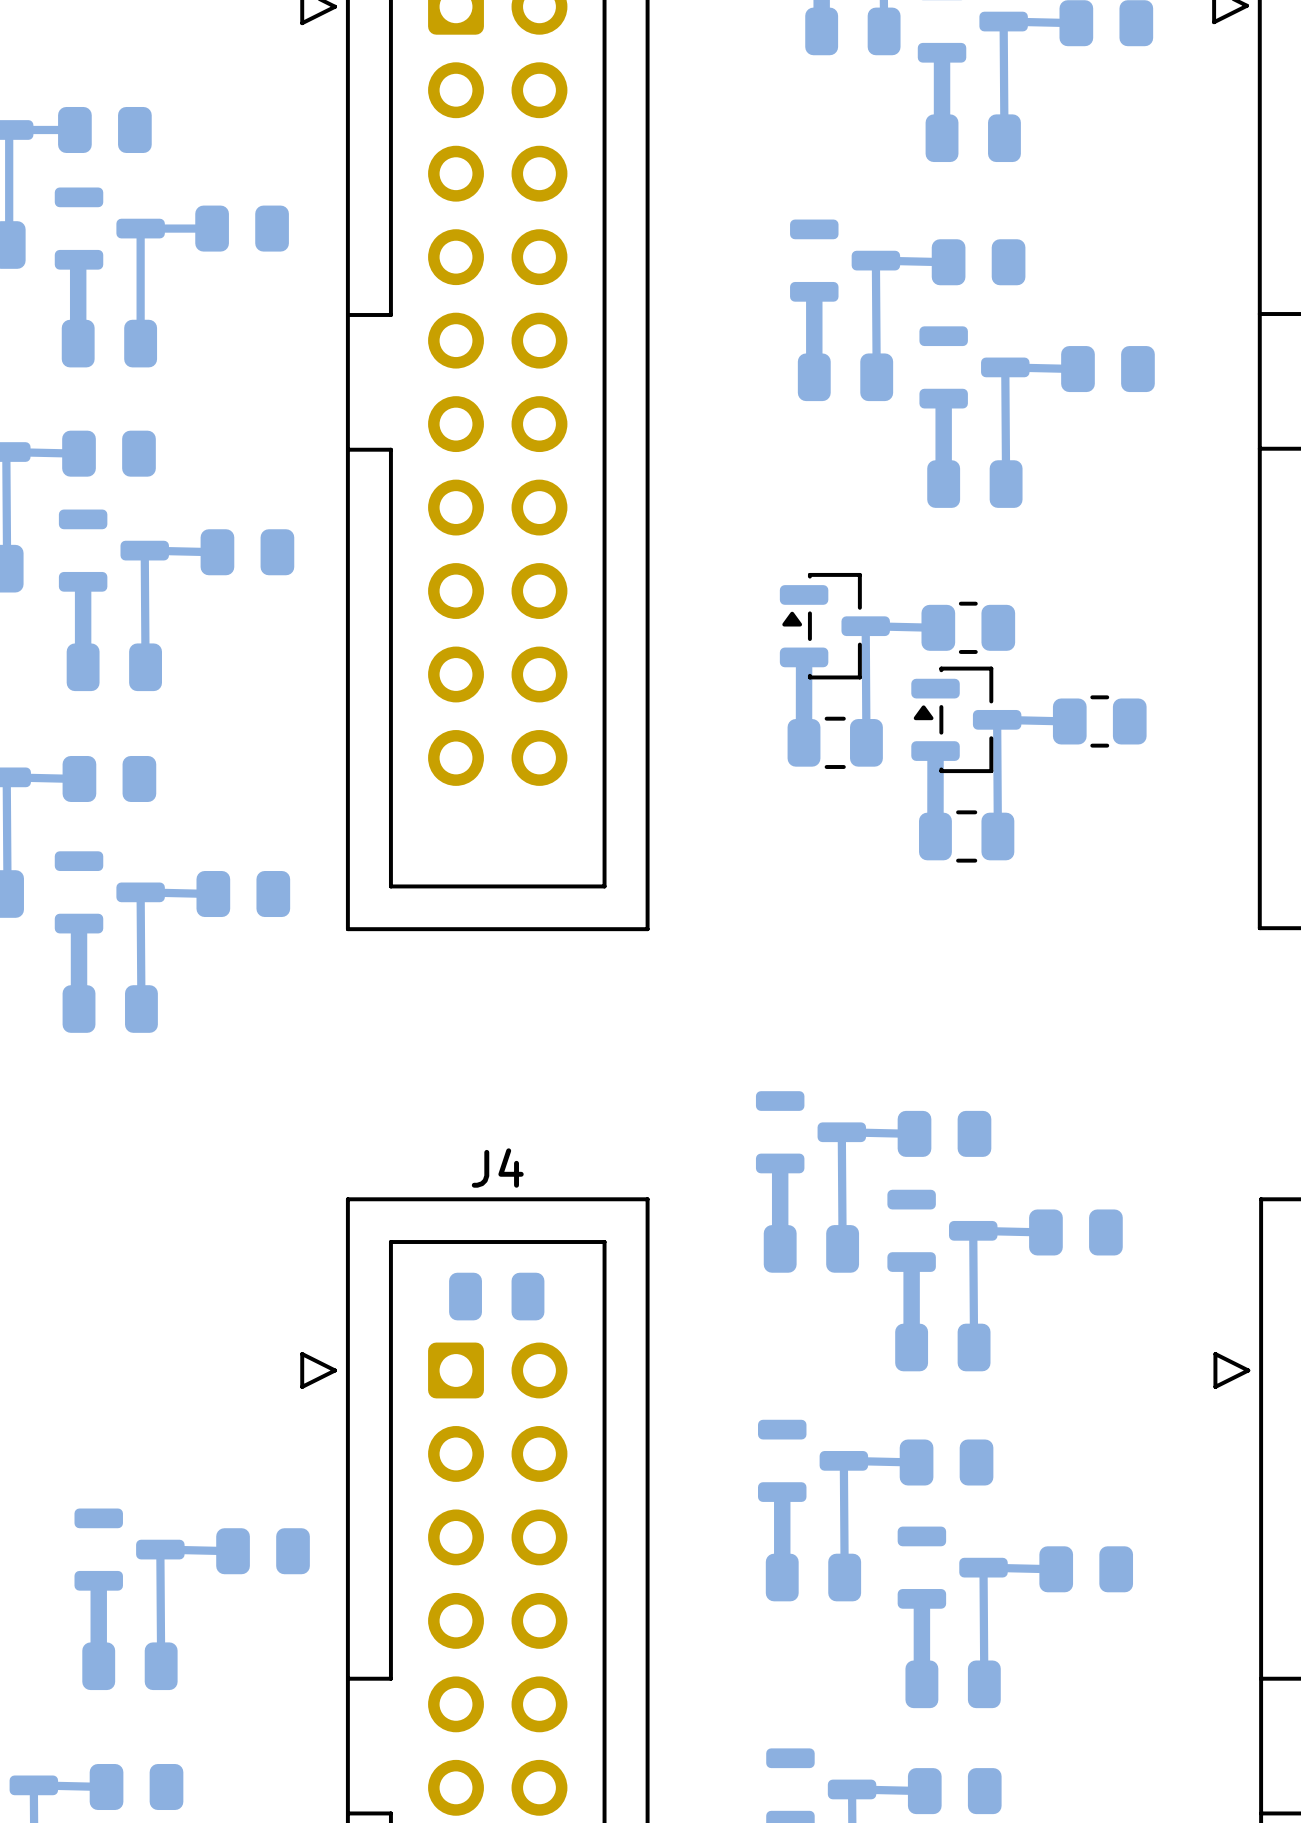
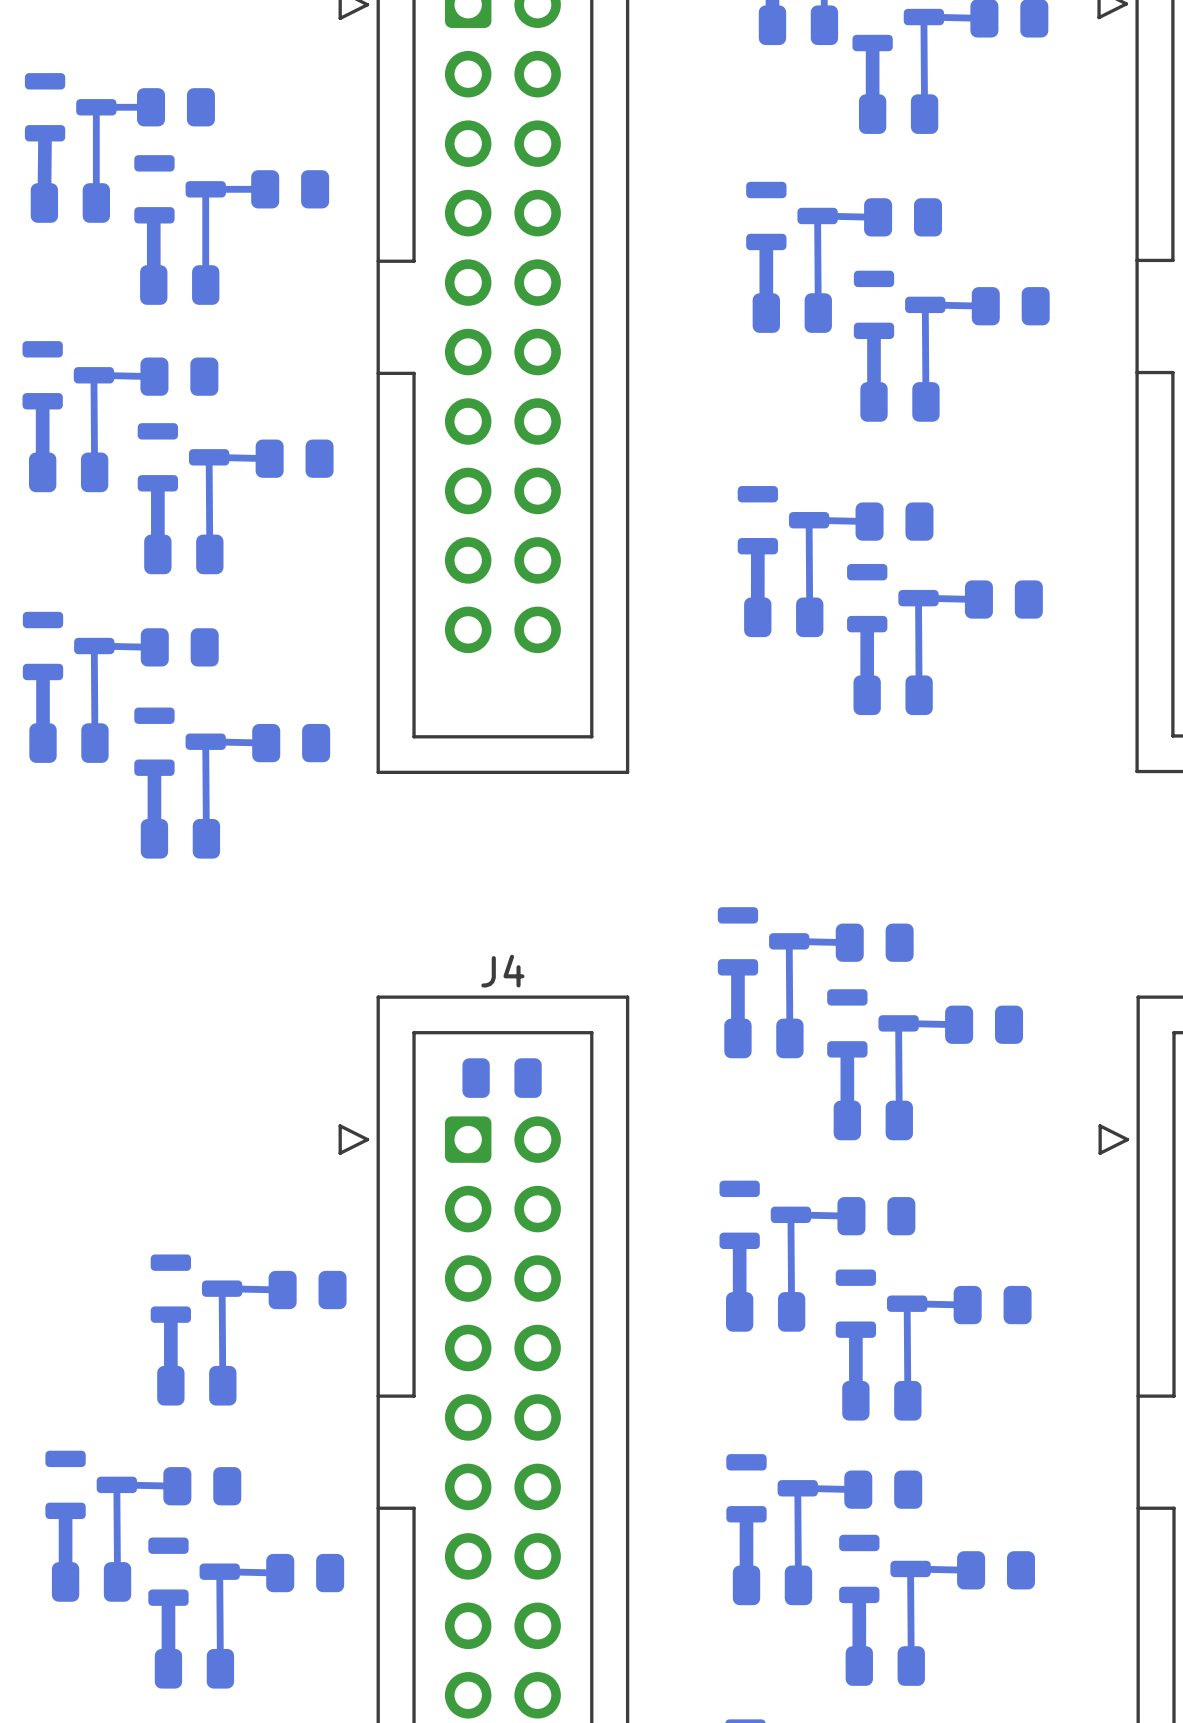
part footprint: [779, 572, 890, 680] -> [737, 486, 830, 555]
part footprint: [921, 601, 1016, 654] -> [855, 502, 934, 541]
part footprint: [911, 666, 1022, 774] -> [847, 563, 939, 633]
part footprint: [1052, 695, 1147, 748] -> [964, 580, 1043, 619]
part footprint: [787, 716, 883, 769] -> [744, 597, 824, 638]
part footprint: [919, 810, 1015, 863] -> [853, 675, 933, 716]

